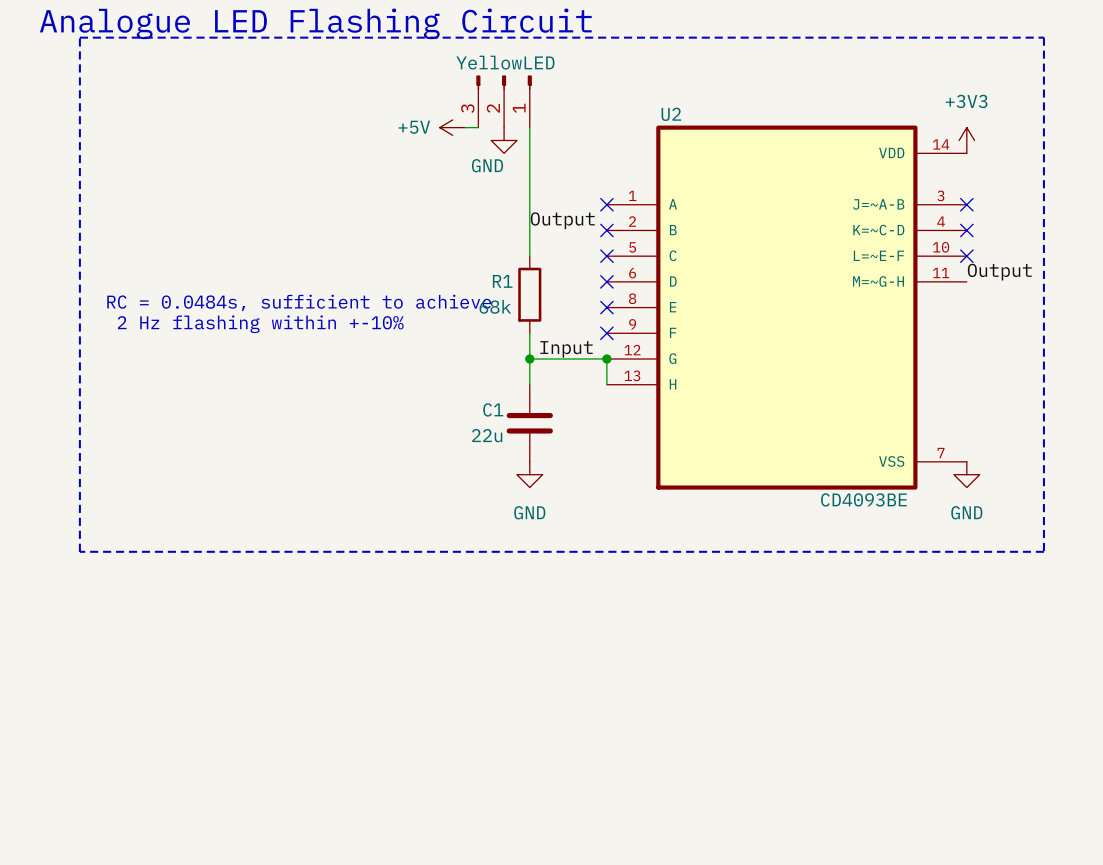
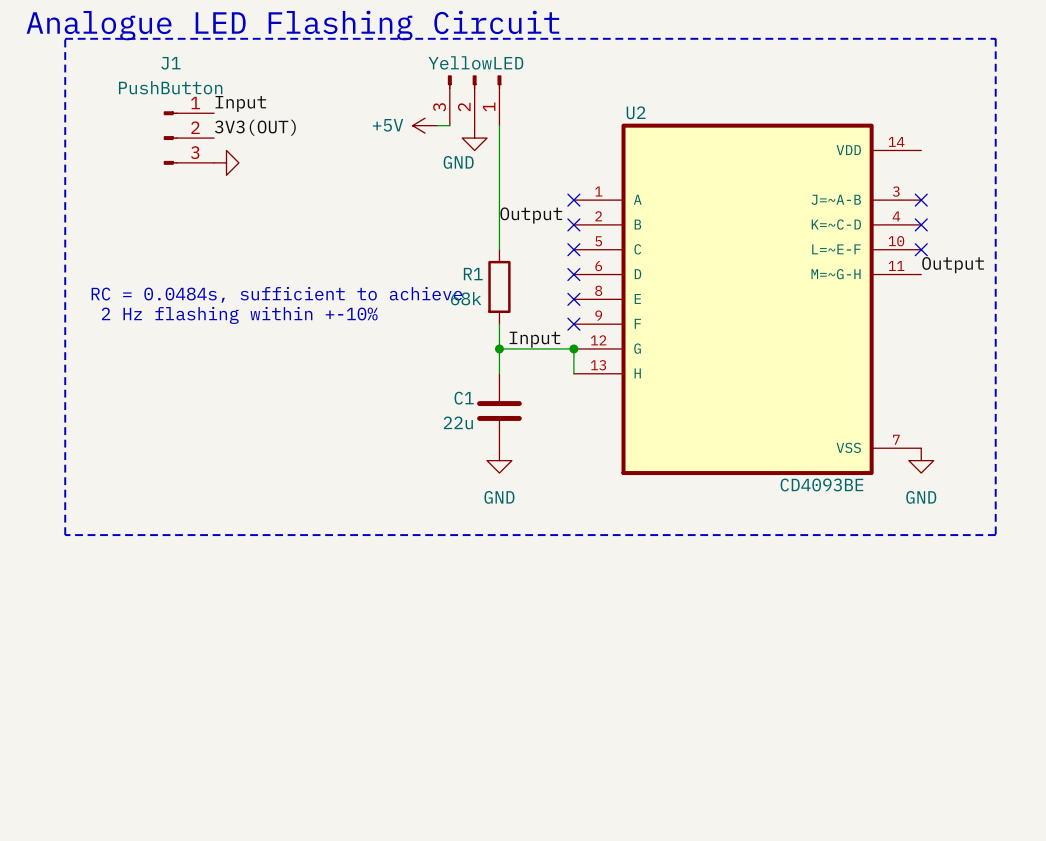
label: none -> Input (240, 103)
label: none -> 3V3(OUT) (255, 127)
J1: none -> PushButton (188, 138)
power symbol: +3V3 (966, 140) -> none
power symbol: none -> (226, 162)

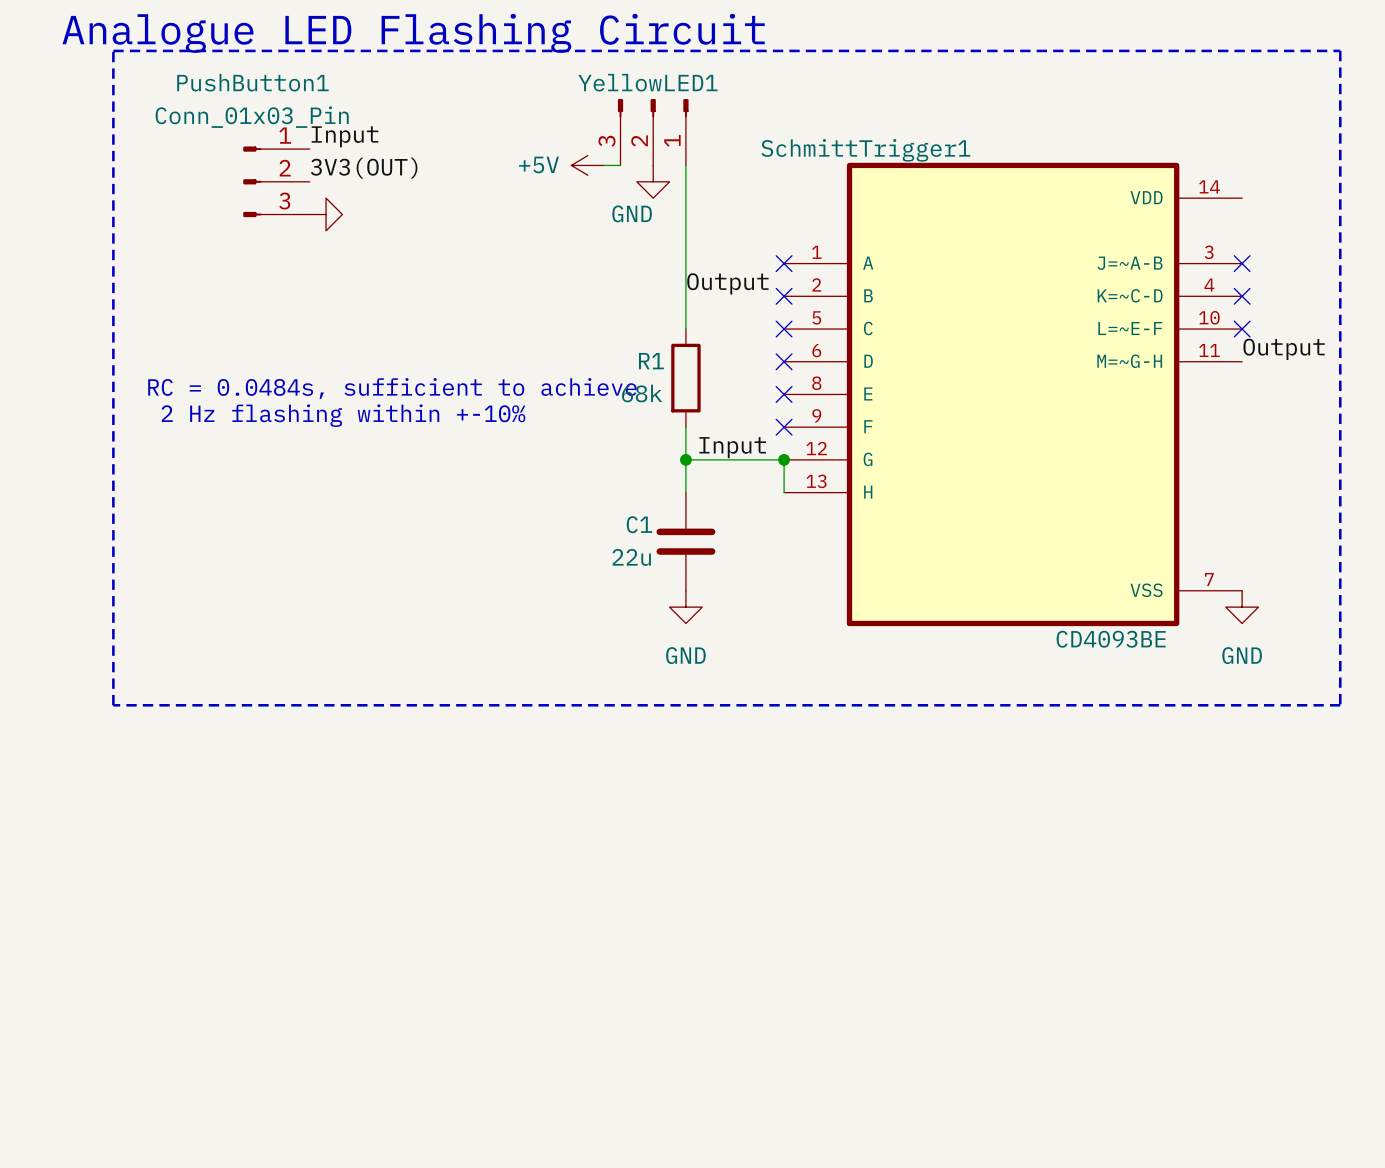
YellowLED name: YellowLED (475, 62) -> YellowLED1 (647, 82)
J1 name: J1 (170, 63) -> PushButton1 (252, 82)
J1 value: PushButton (170, 87) -> Conn_01x03_Pin (252, 117)
U2 name: U2 (636, 112) -> SchmittTrigger1 (865, 150)

